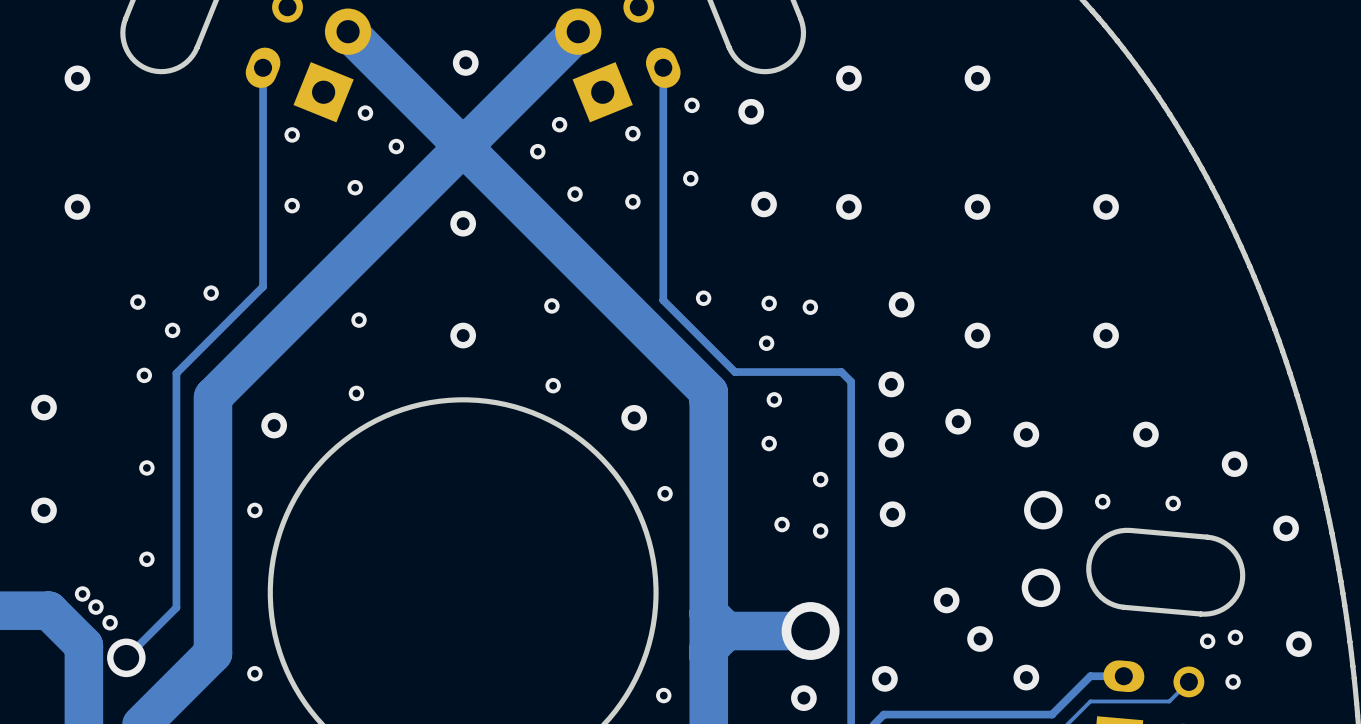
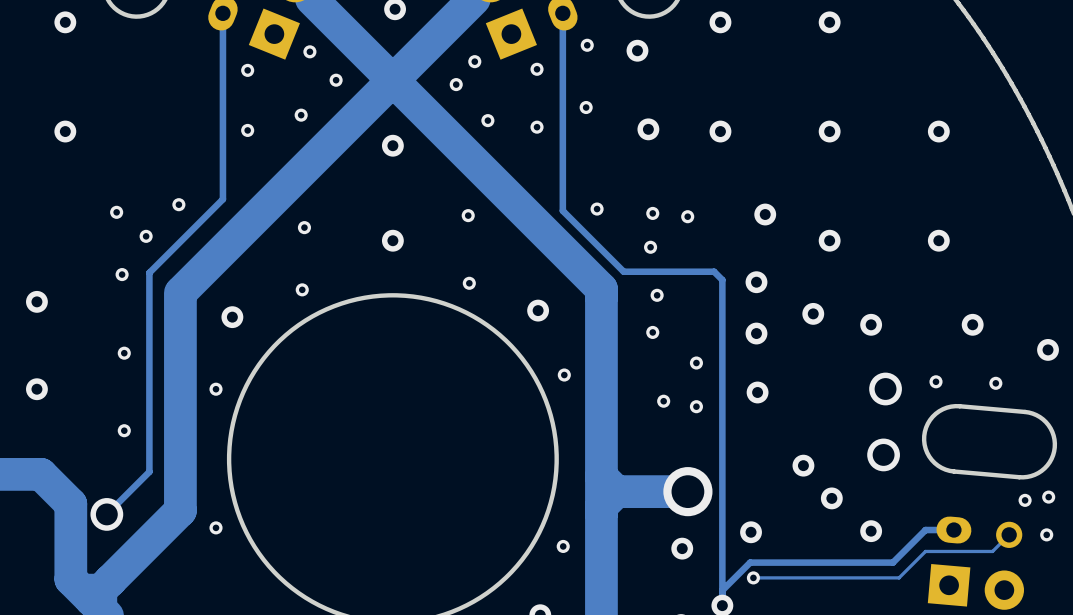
via: (82, 593) -> none
via: (95, 607) -> none
via: (110, 622) -> none

